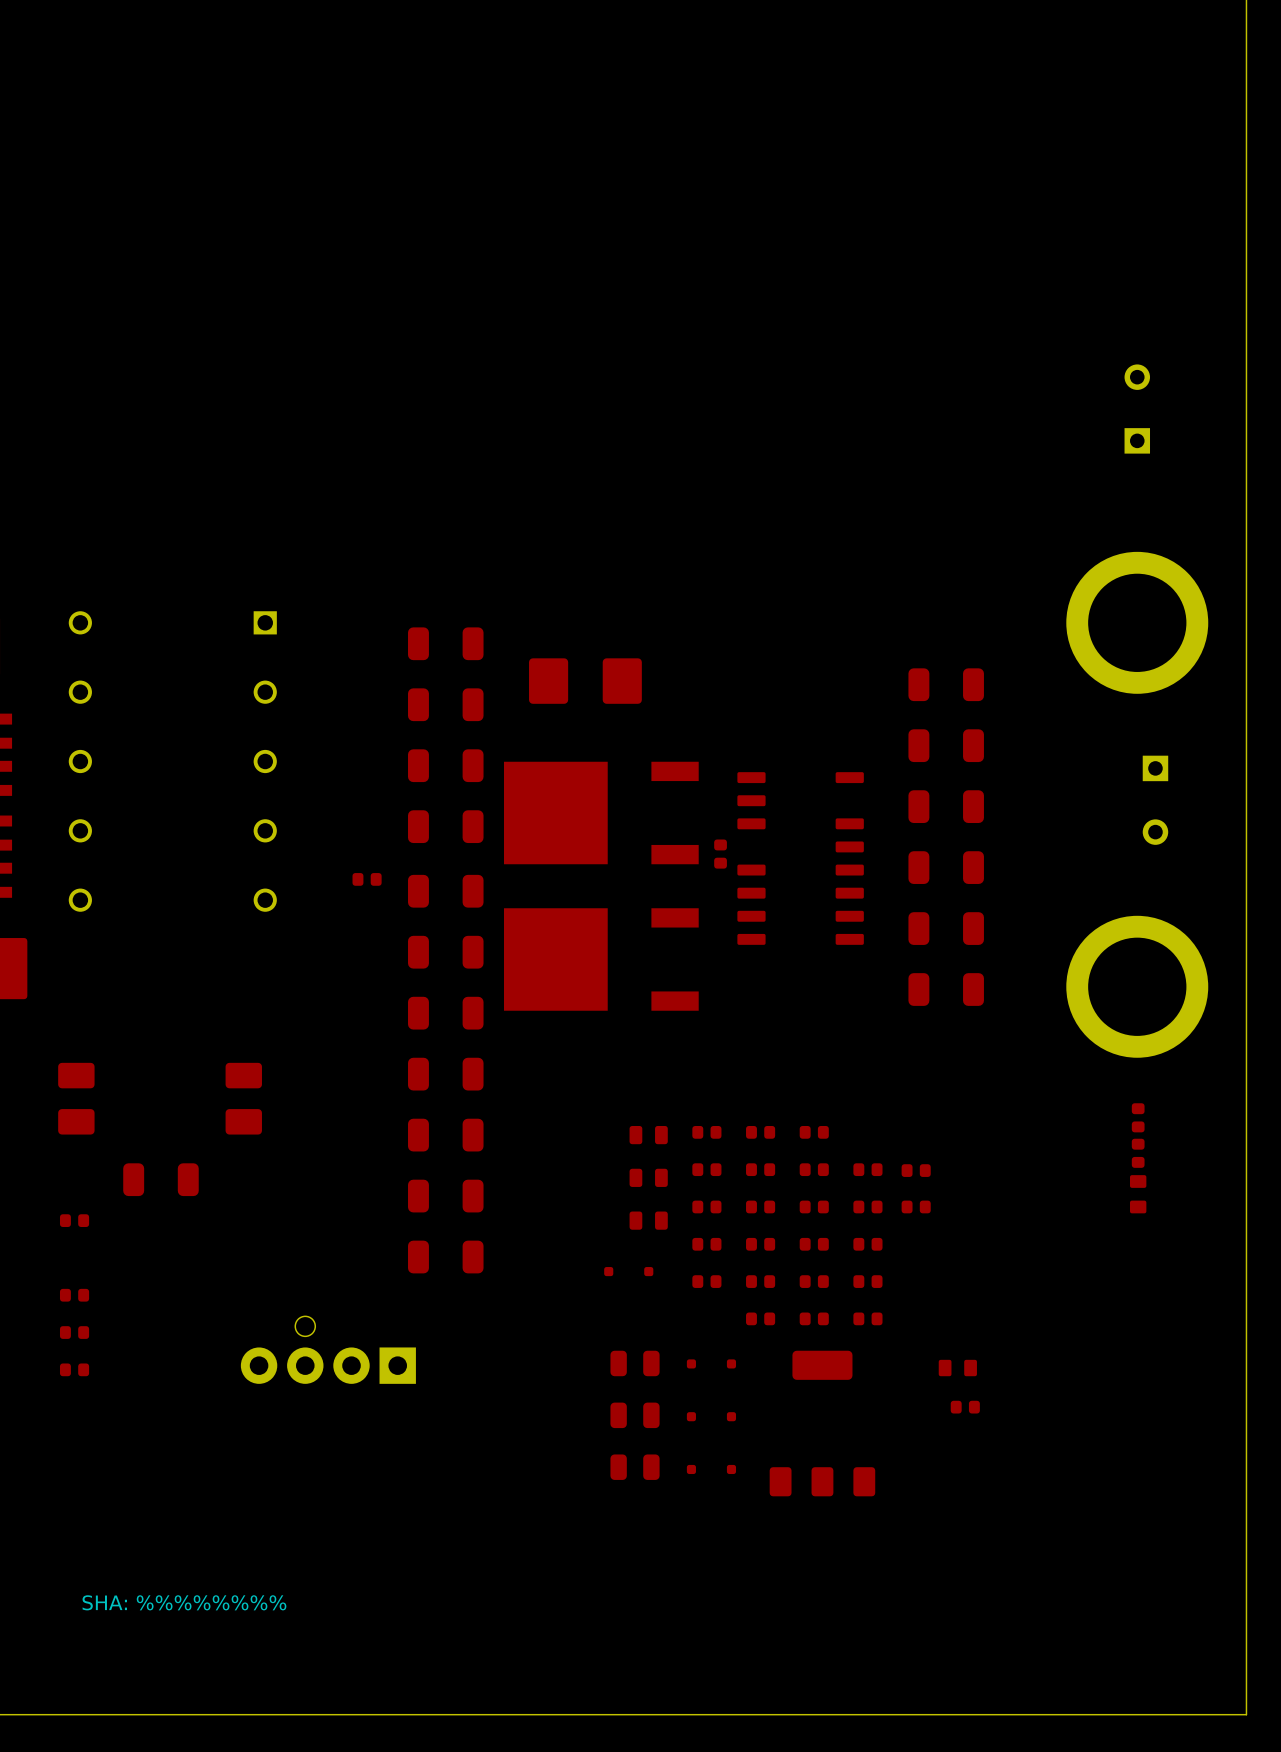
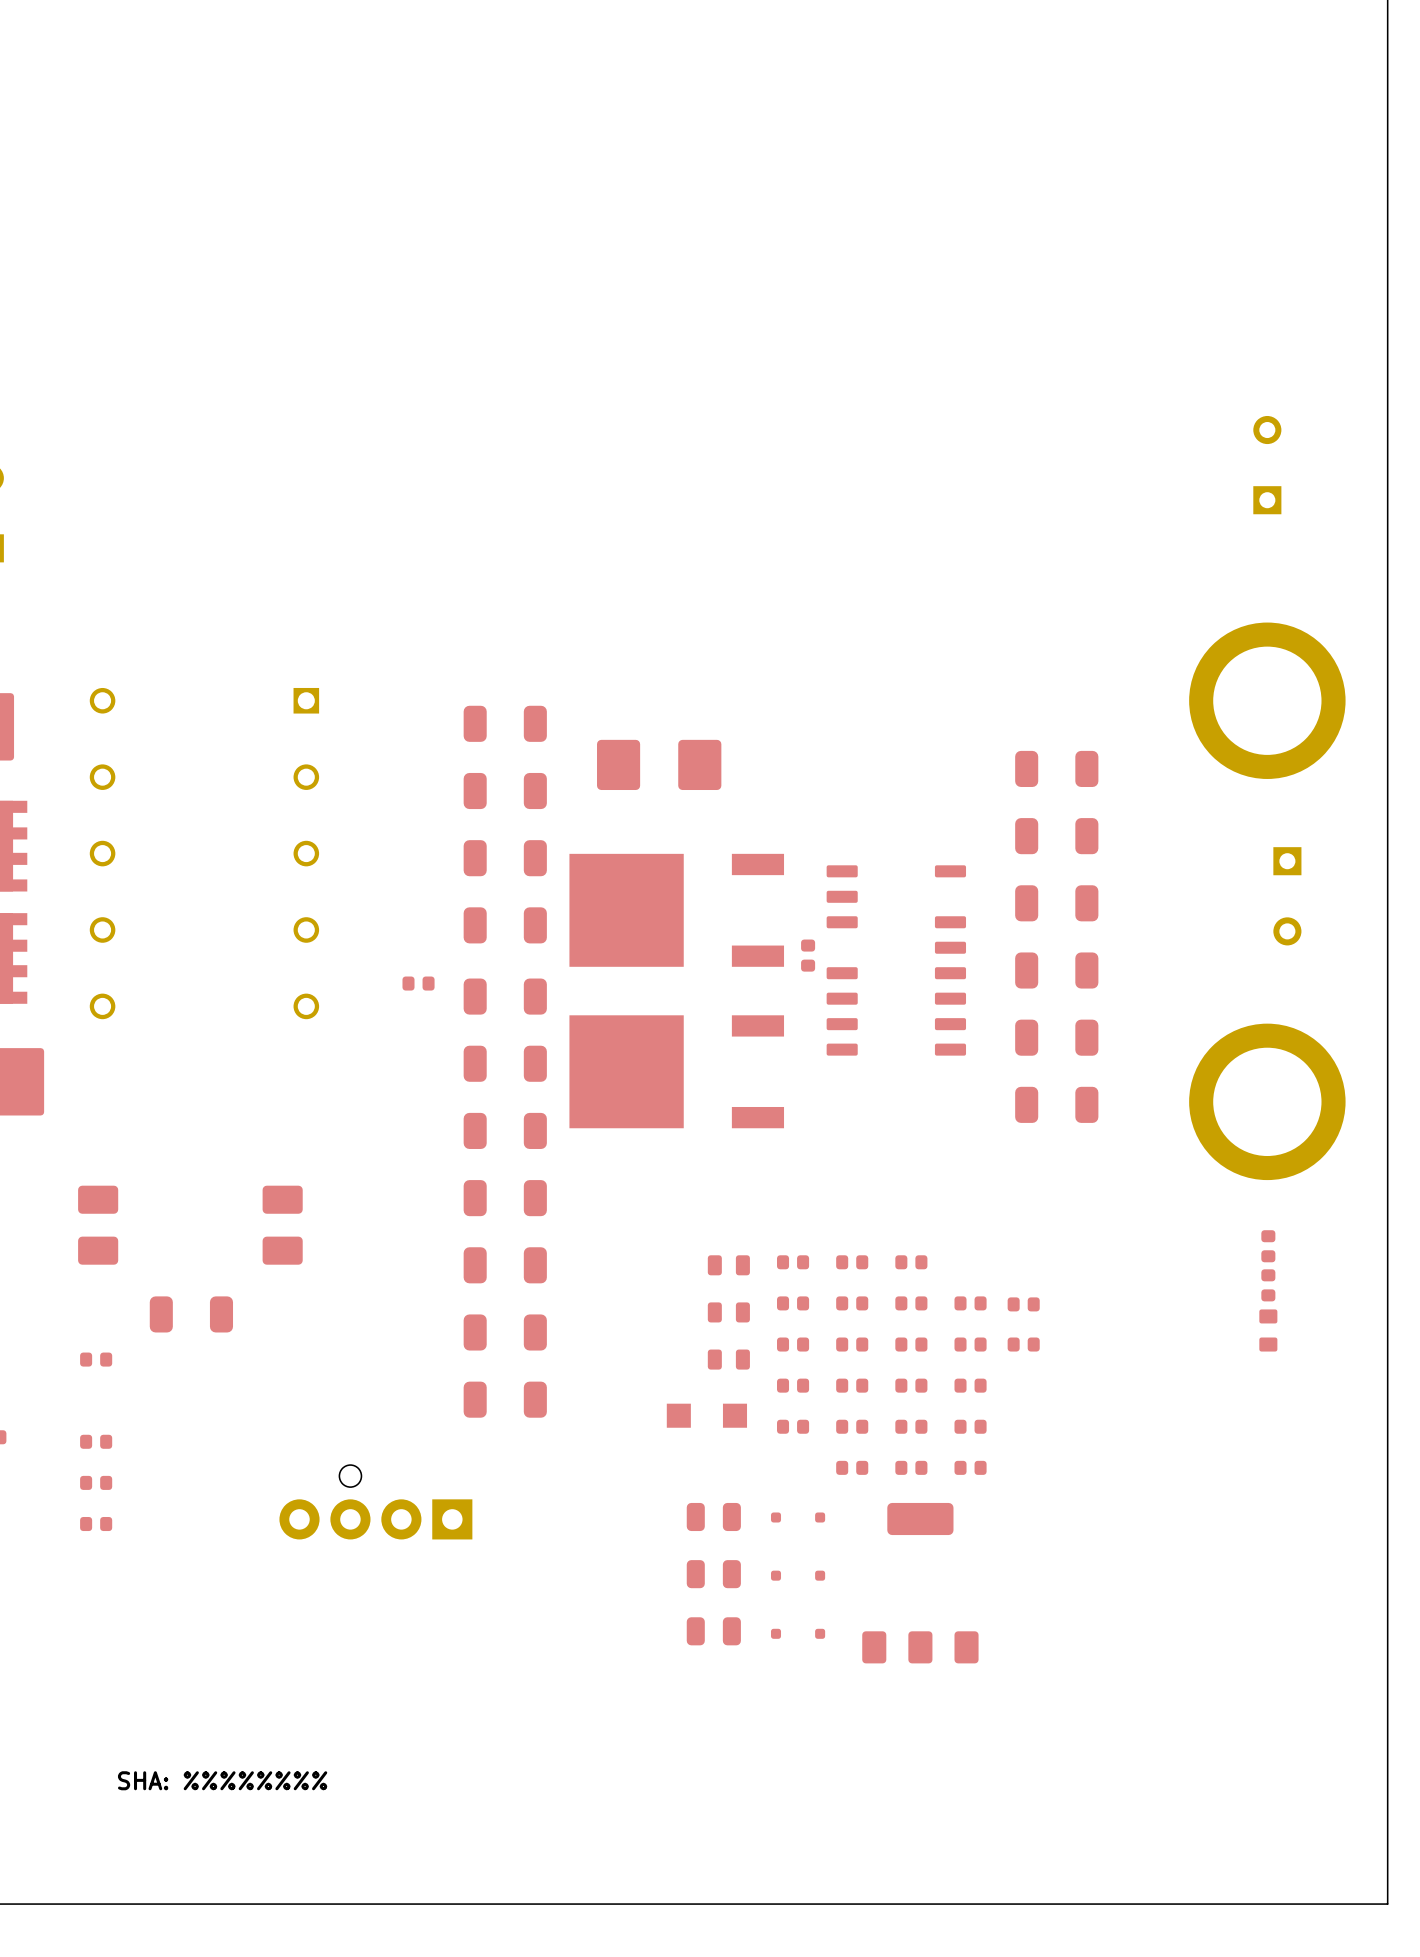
part footprint: [604, 1267, 654, 1277] -> [666, 1403, 748, 1428]
part: (957, 1368) -> none
part: (965, 1407) -> none

